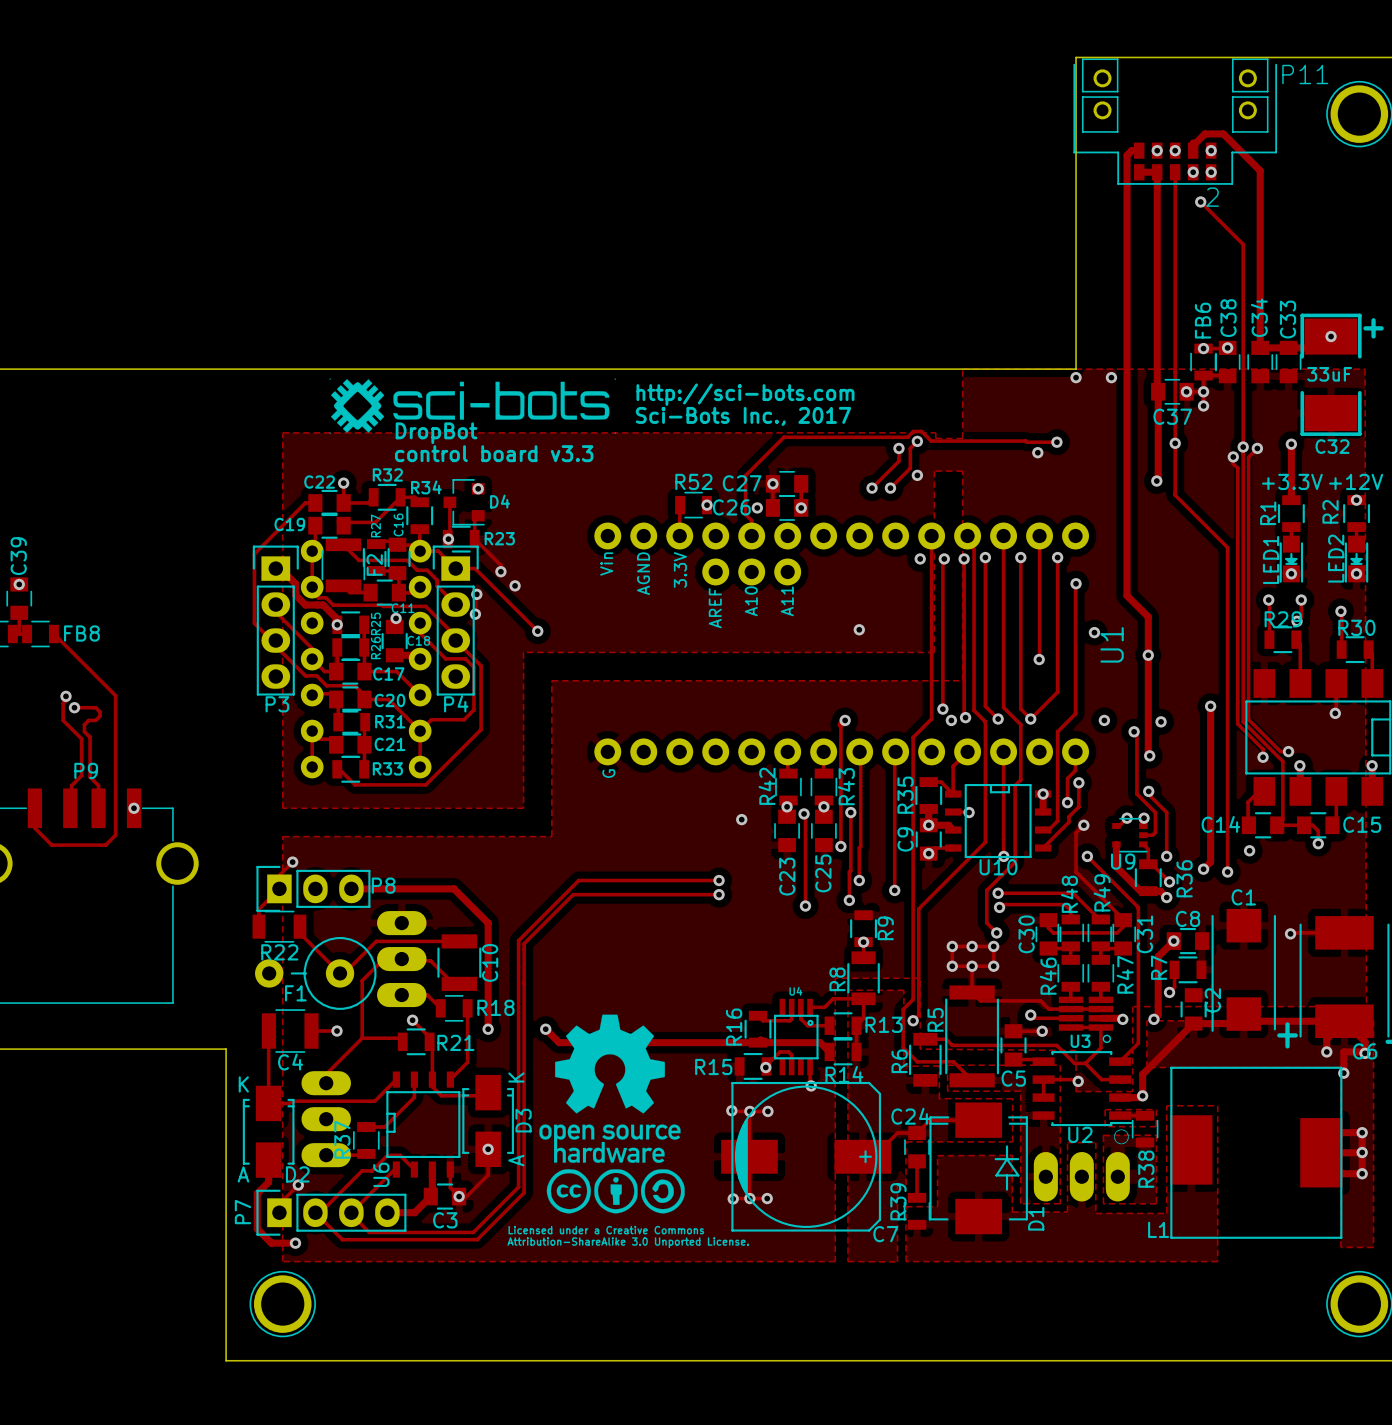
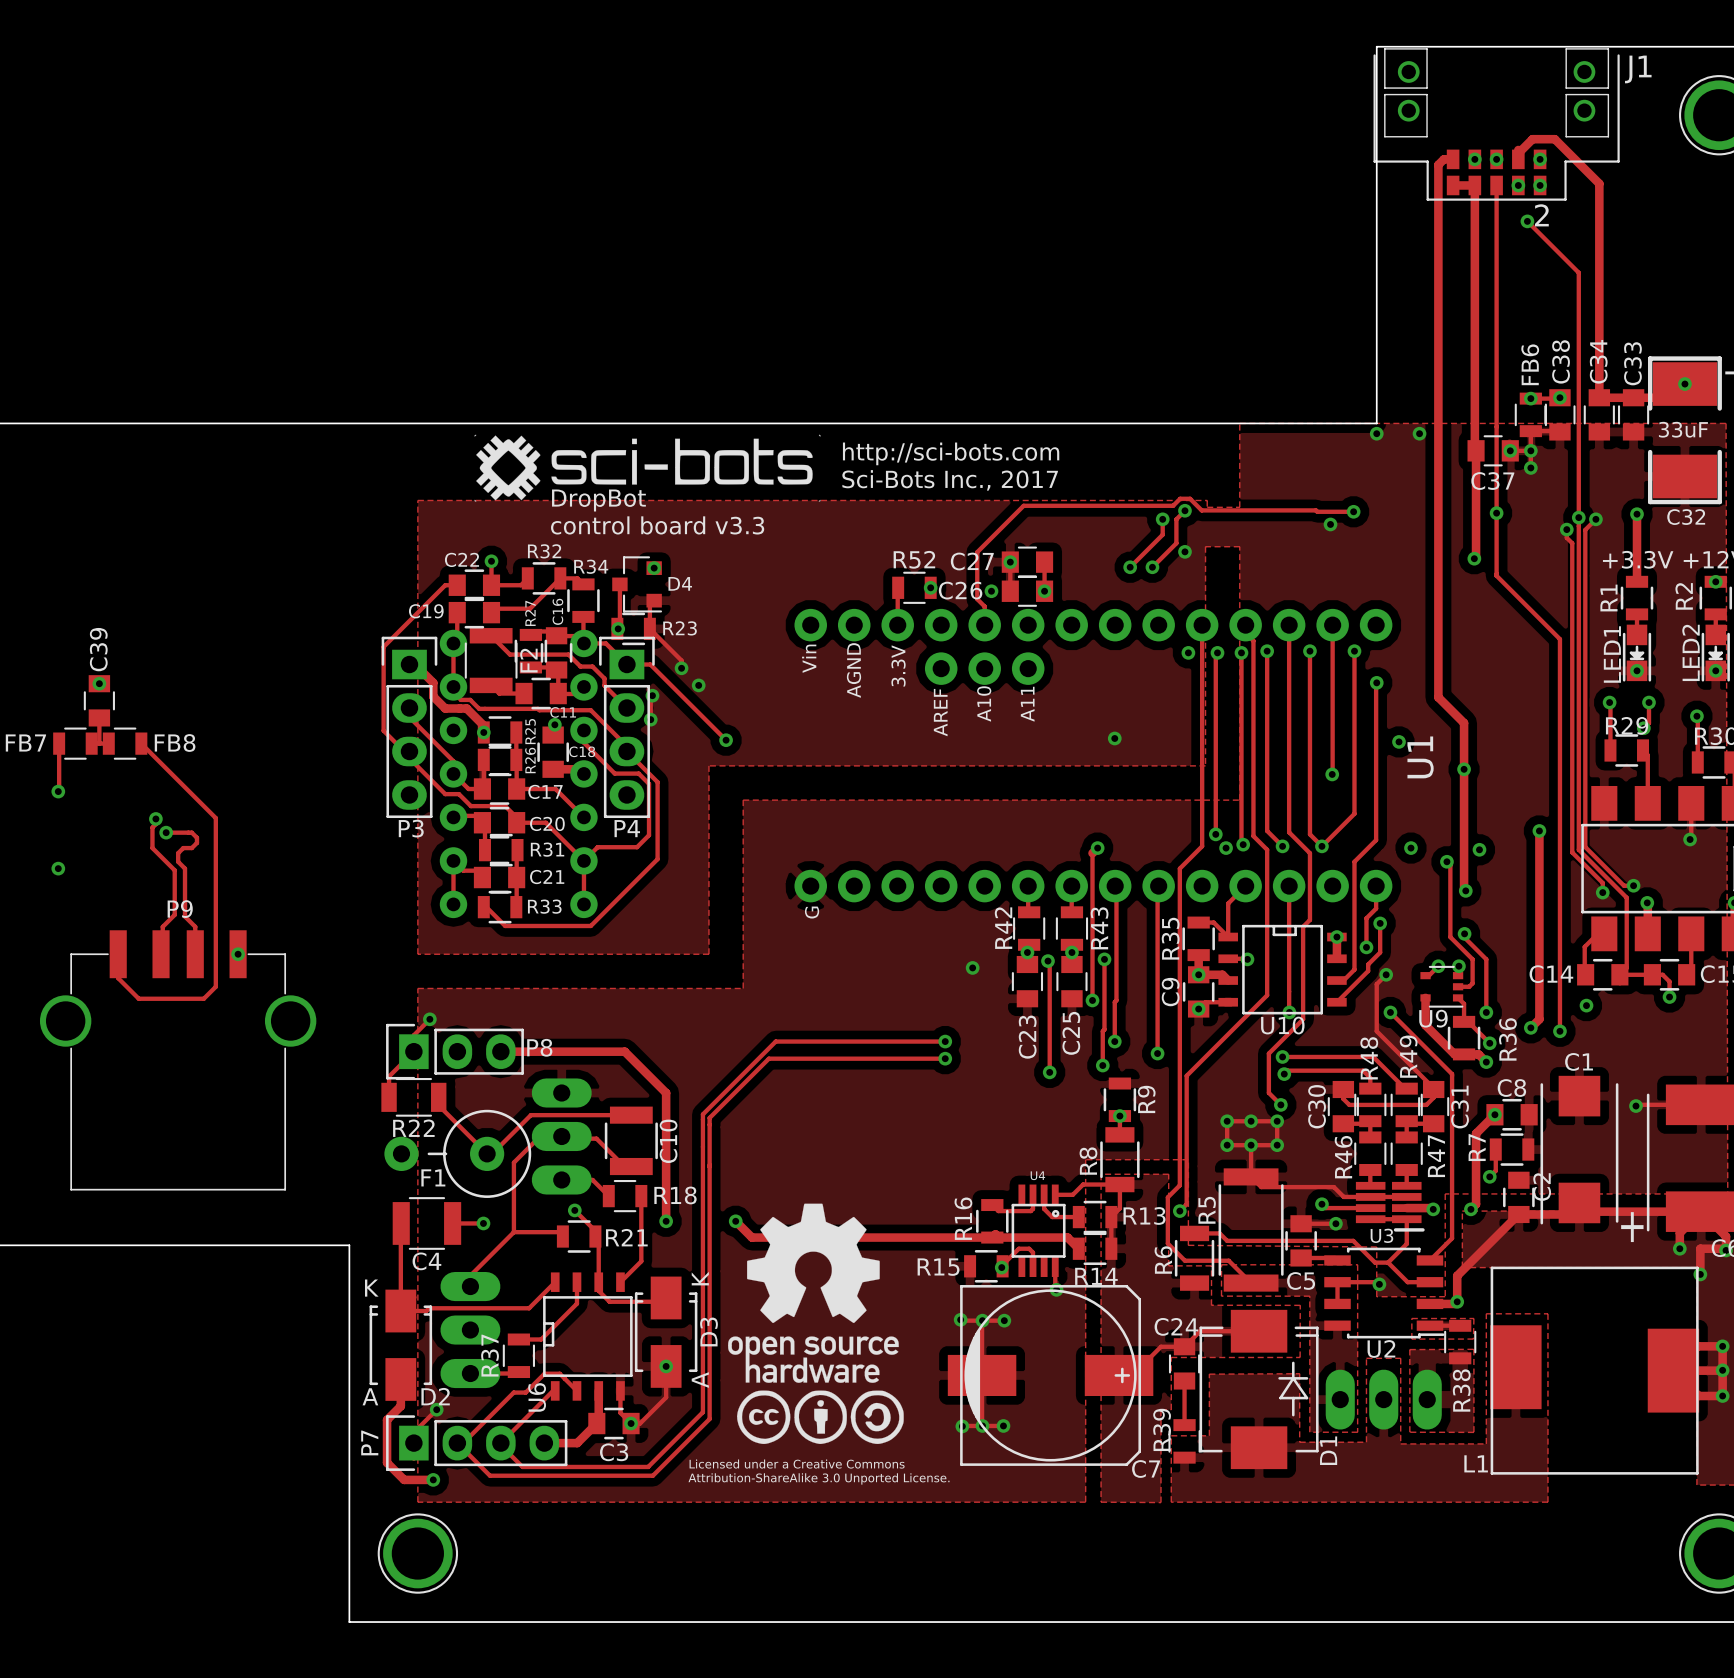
P11 name: P11 (1305, 74) -> J1 (1638, 69)
U3 footprint: [1058, 996, 1114, 1044] -> [1355, 1181, 1425, 1232]
U2 footprint: [1032, 1051, 1133, 1145] -> [1324, 1247, 1445, 1339]

